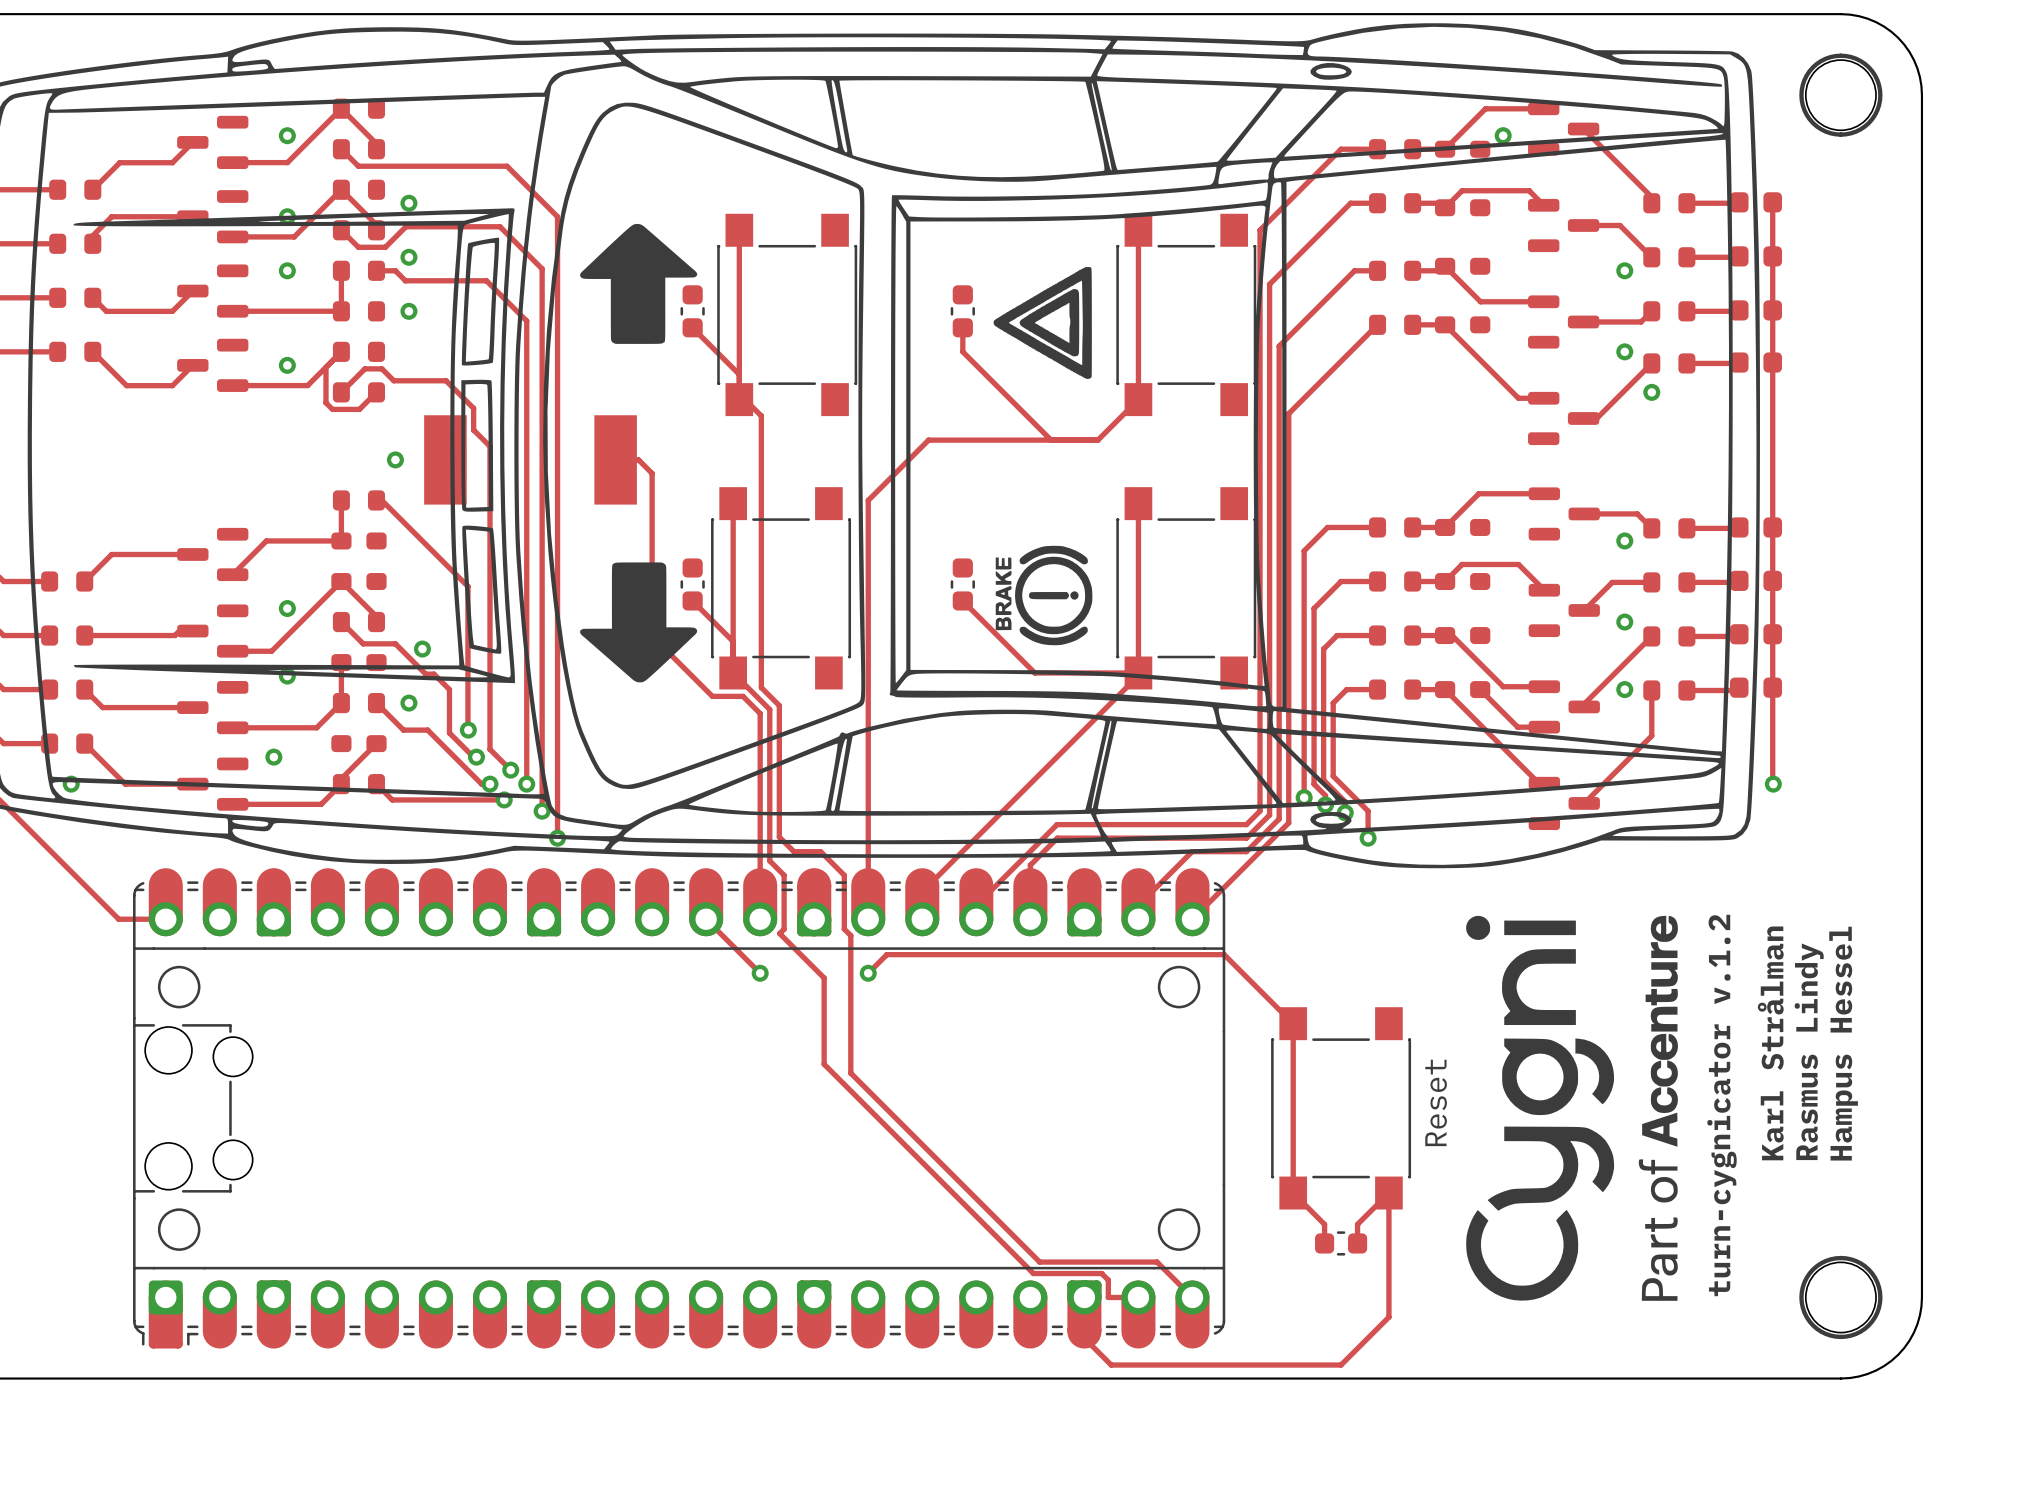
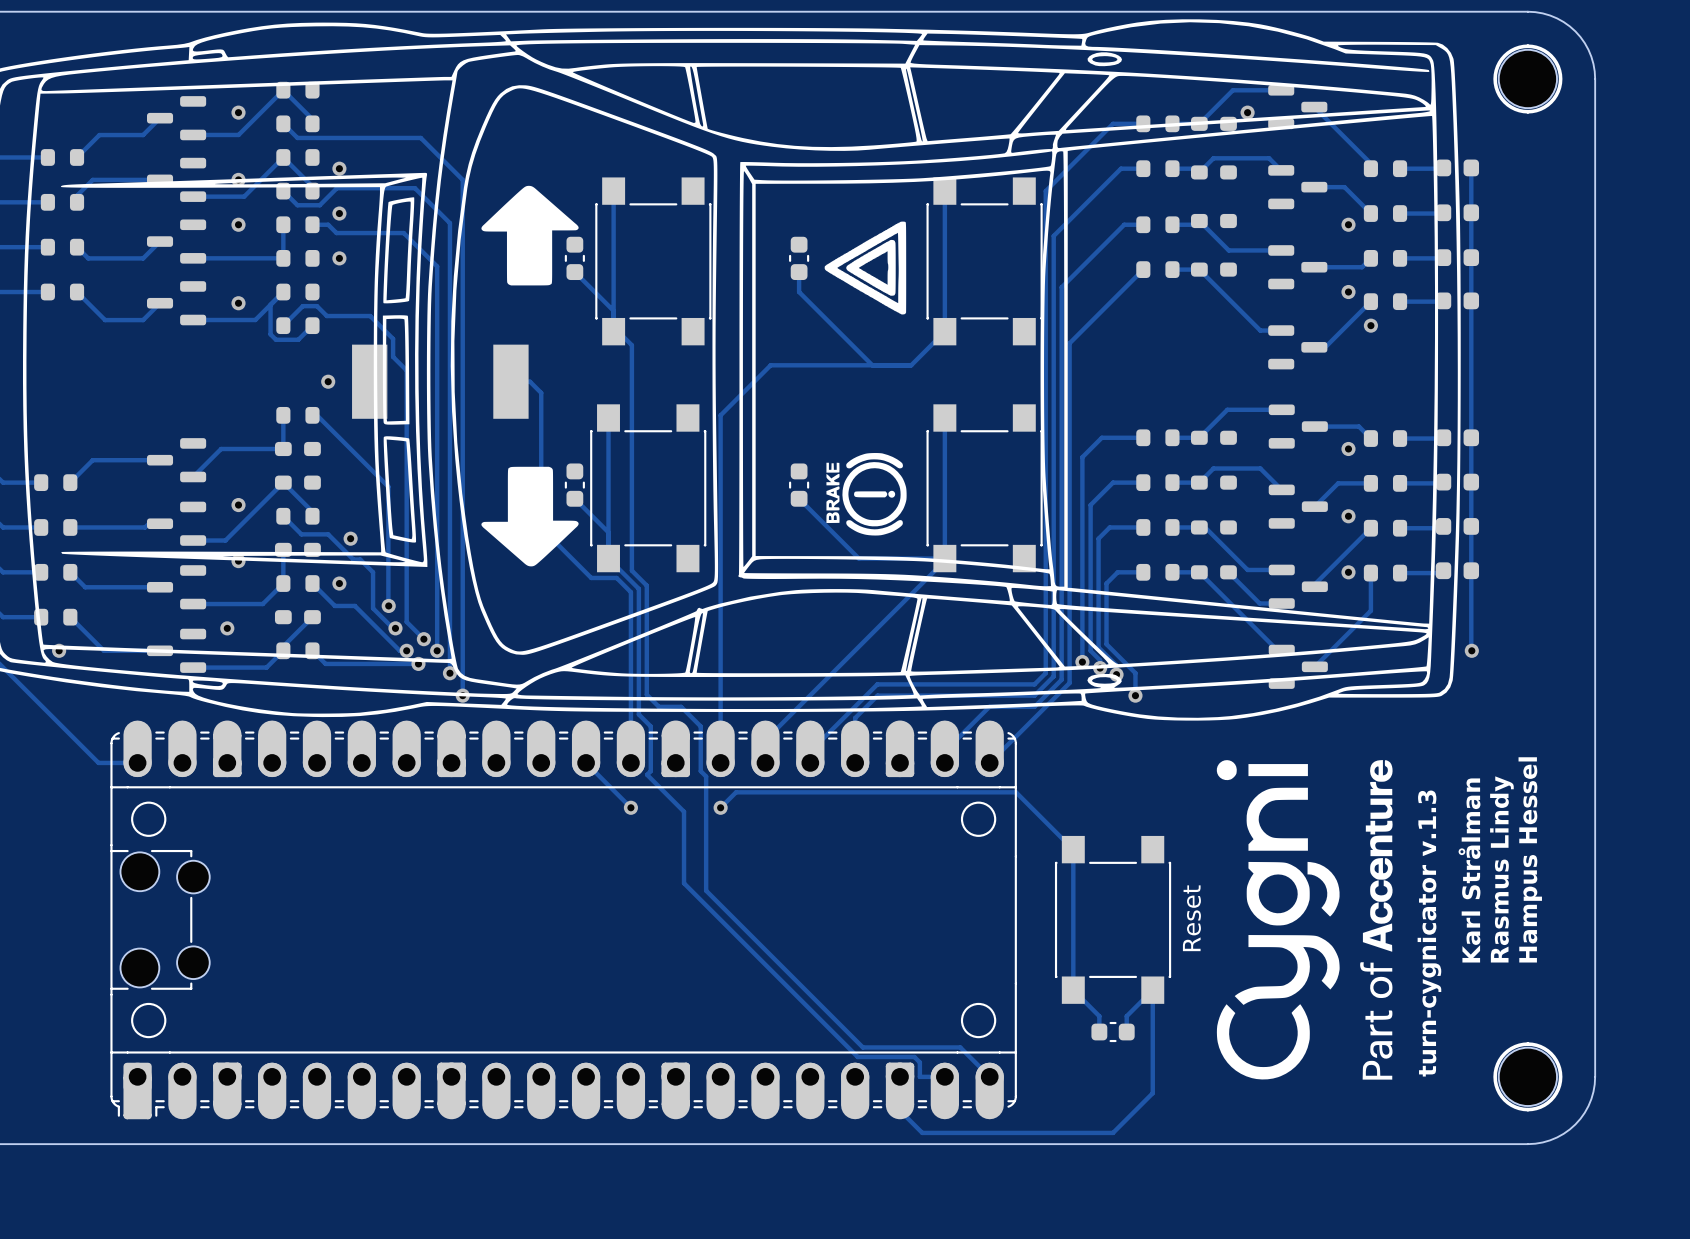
text: turn-cygnicator v.1.2 (1722, 1105) -> turn-cygnicator v.1.3 (1429, 933)

